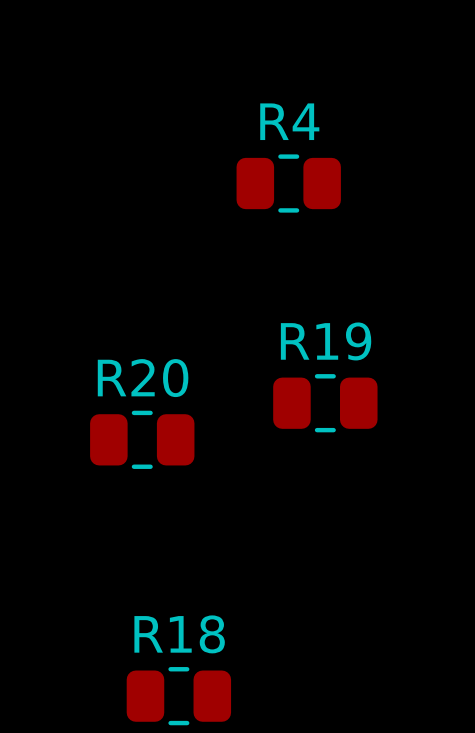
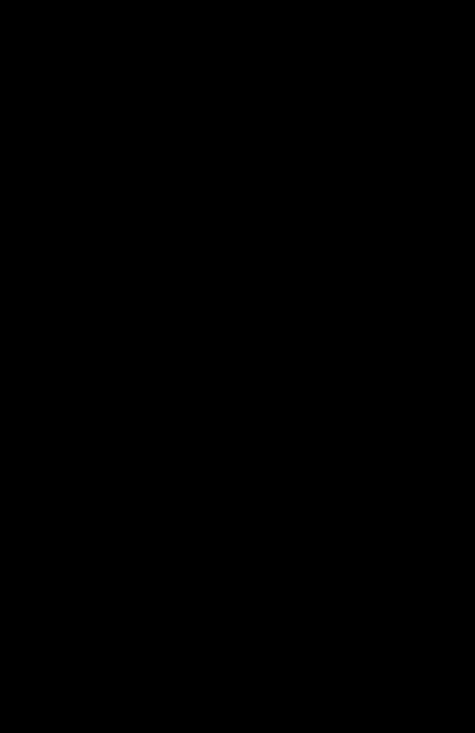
R4: (288, 183) -> none
R19: (325, 403) -> none
R20: (142, 439) -> none
R18: (178, 696) -> none

